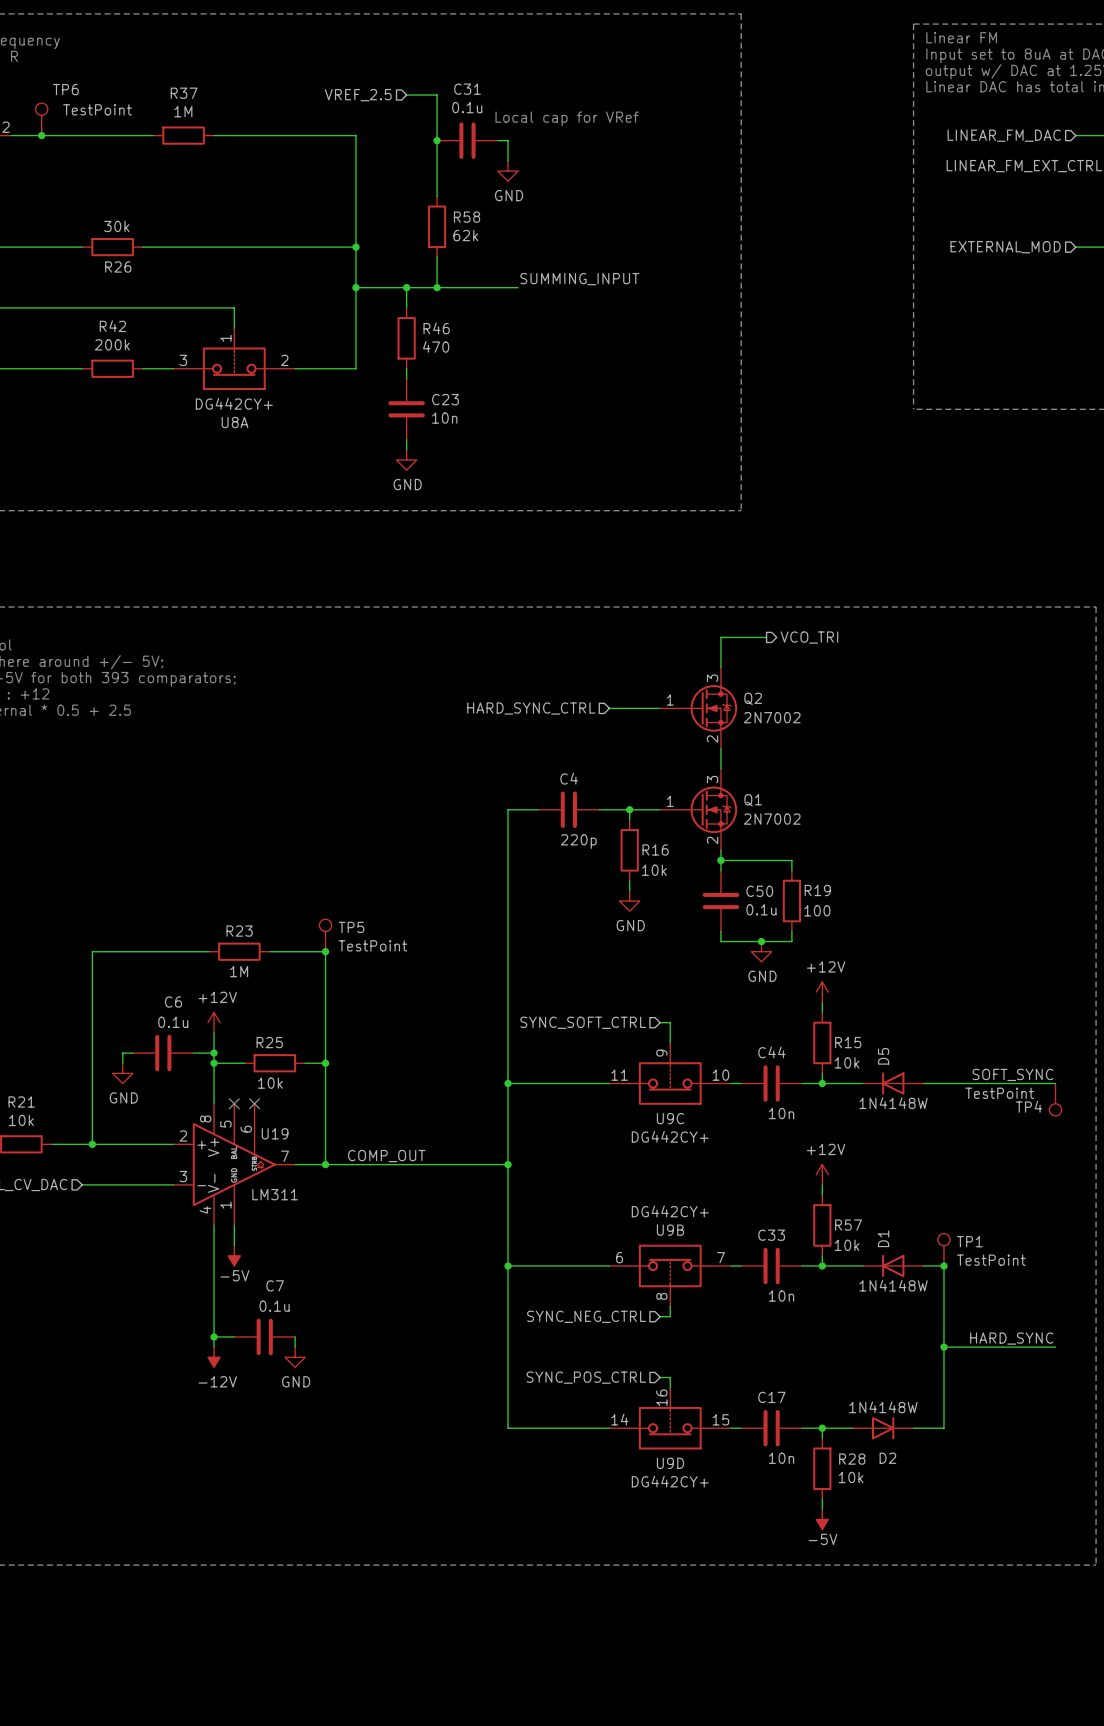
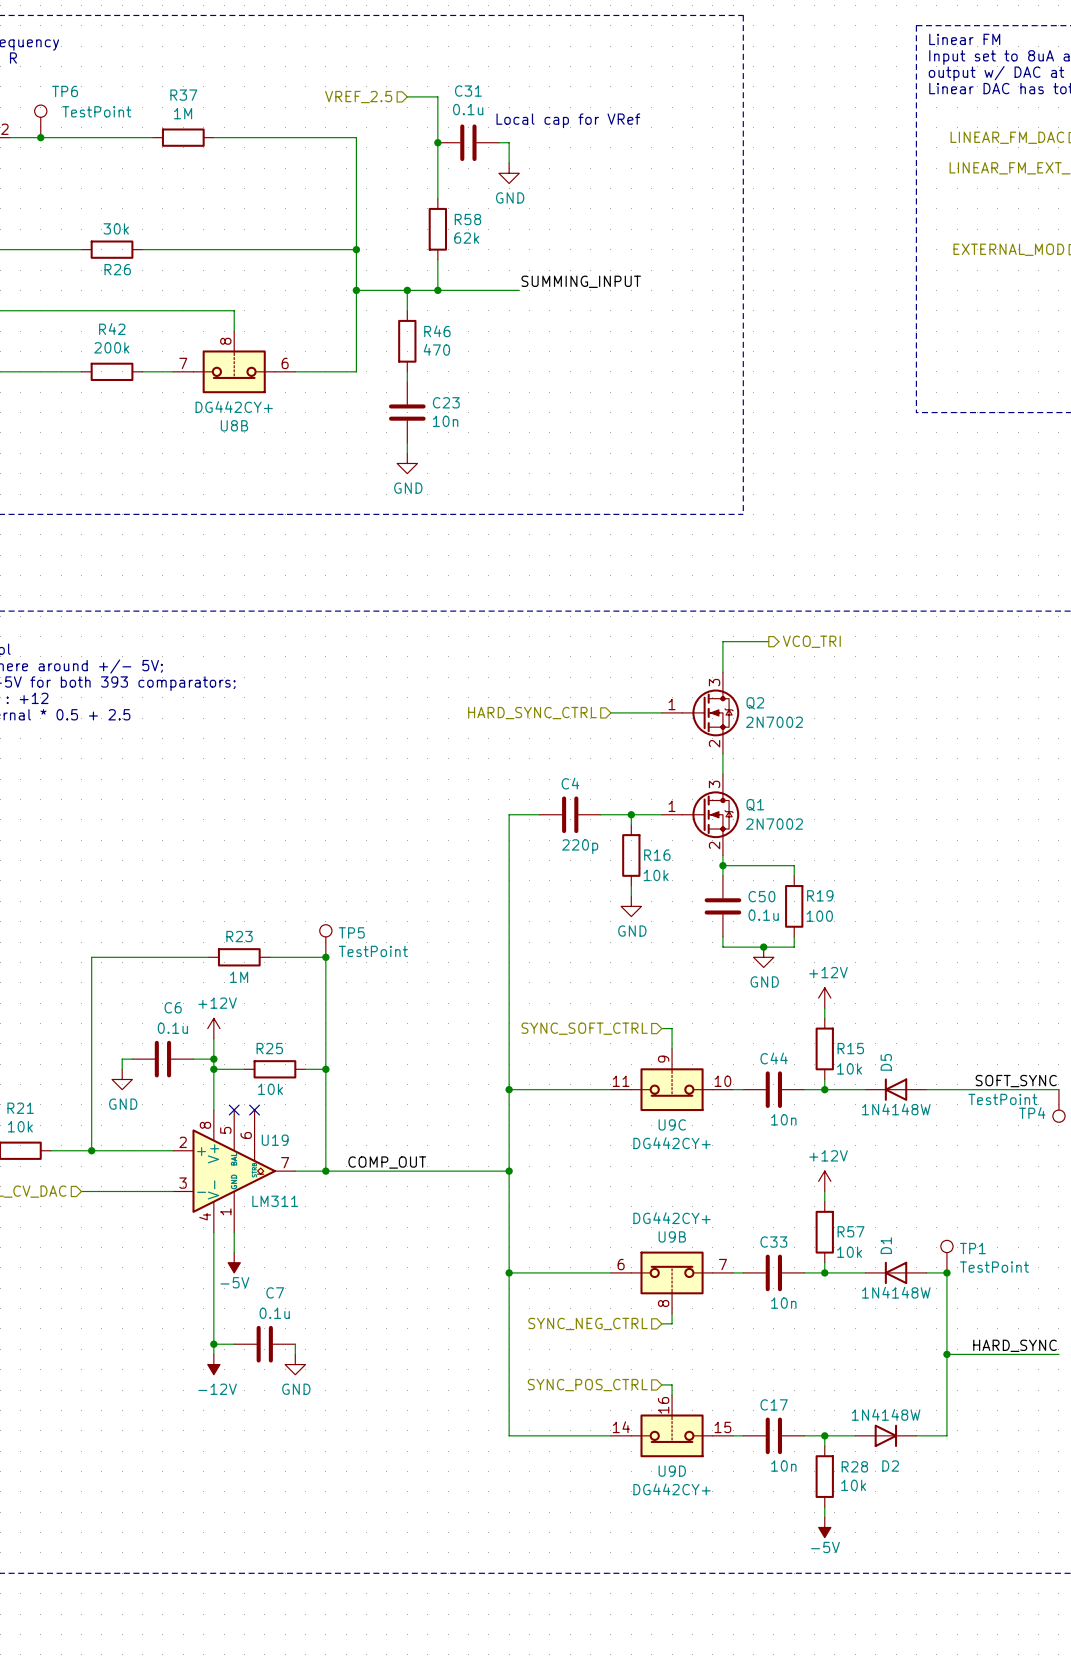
U8A pin number: 1 (225, 338) -> 8 (225, 341)
U8A pin number: 3 (183, 360) -> 7 (183, 363)
U8A pin number: 2 (284, 360) -> 6 (285, 363)
U8A name: U8A (235, 422) -> U8B (234, 425)

